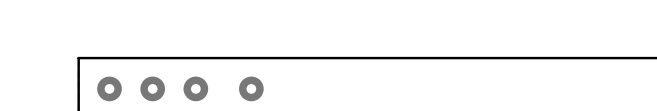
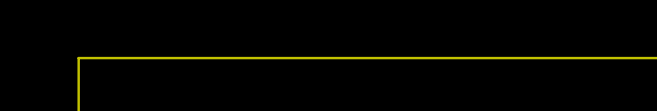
via: (109, 88) -> none
via: (152, 88) -> none
via: (195, 88) -> none
via: (251, 88) -> none

